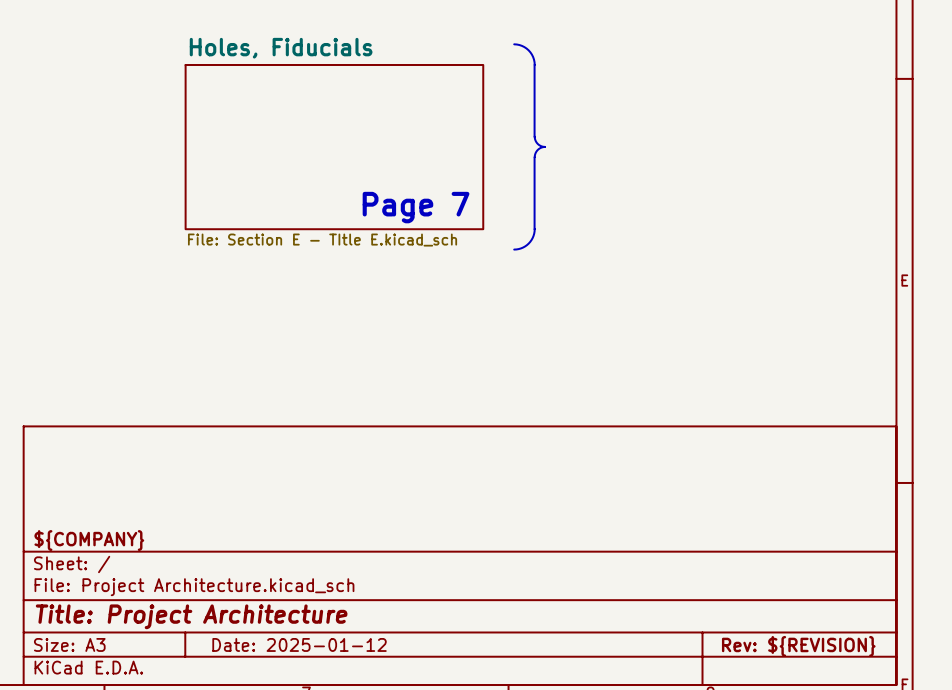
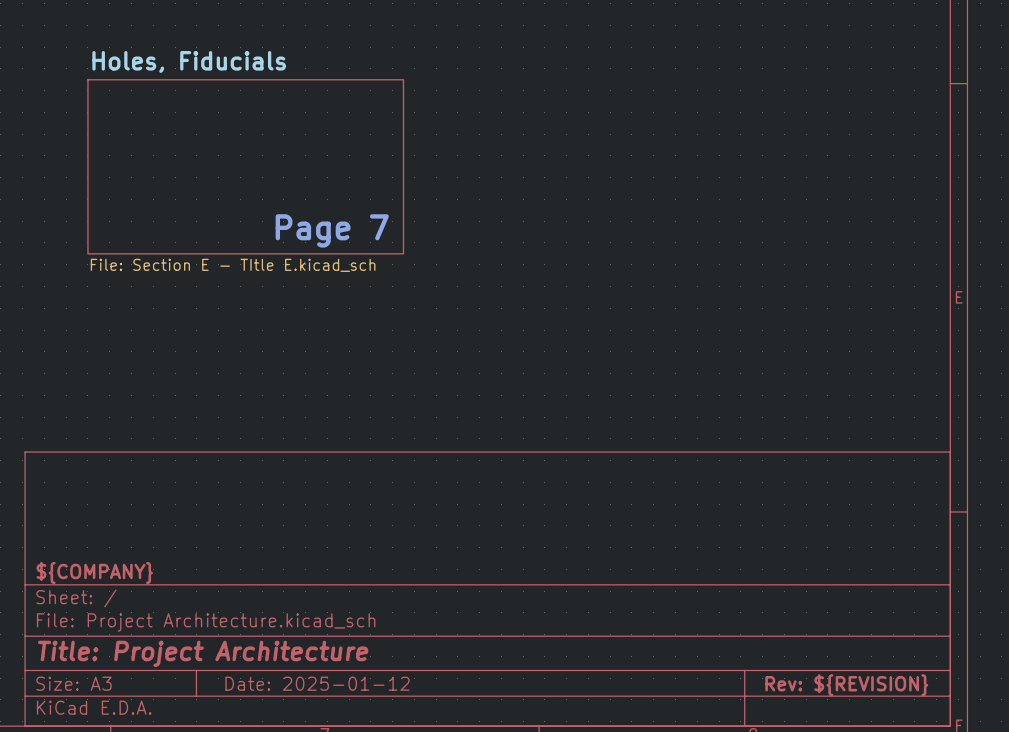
line: (514, 44) (522, 45) (528, 50) (533, 57) (534, 64) -> none
line: (534, 64) (534, 136) -> none
line: (534, 136) (537, 143) (544, 146) (537, 149) (534, 157) -> none
sheet Holes, Fiducials position: (334, 147) -> (245, 166)
line: (534, 157) (534, 229) -> none
text position: Page 7 (416, 207) -> Page 7 (332, 230)
line: (534, 229) (533, 235) (528, 243) (523, 247) (514, 249) -> none

